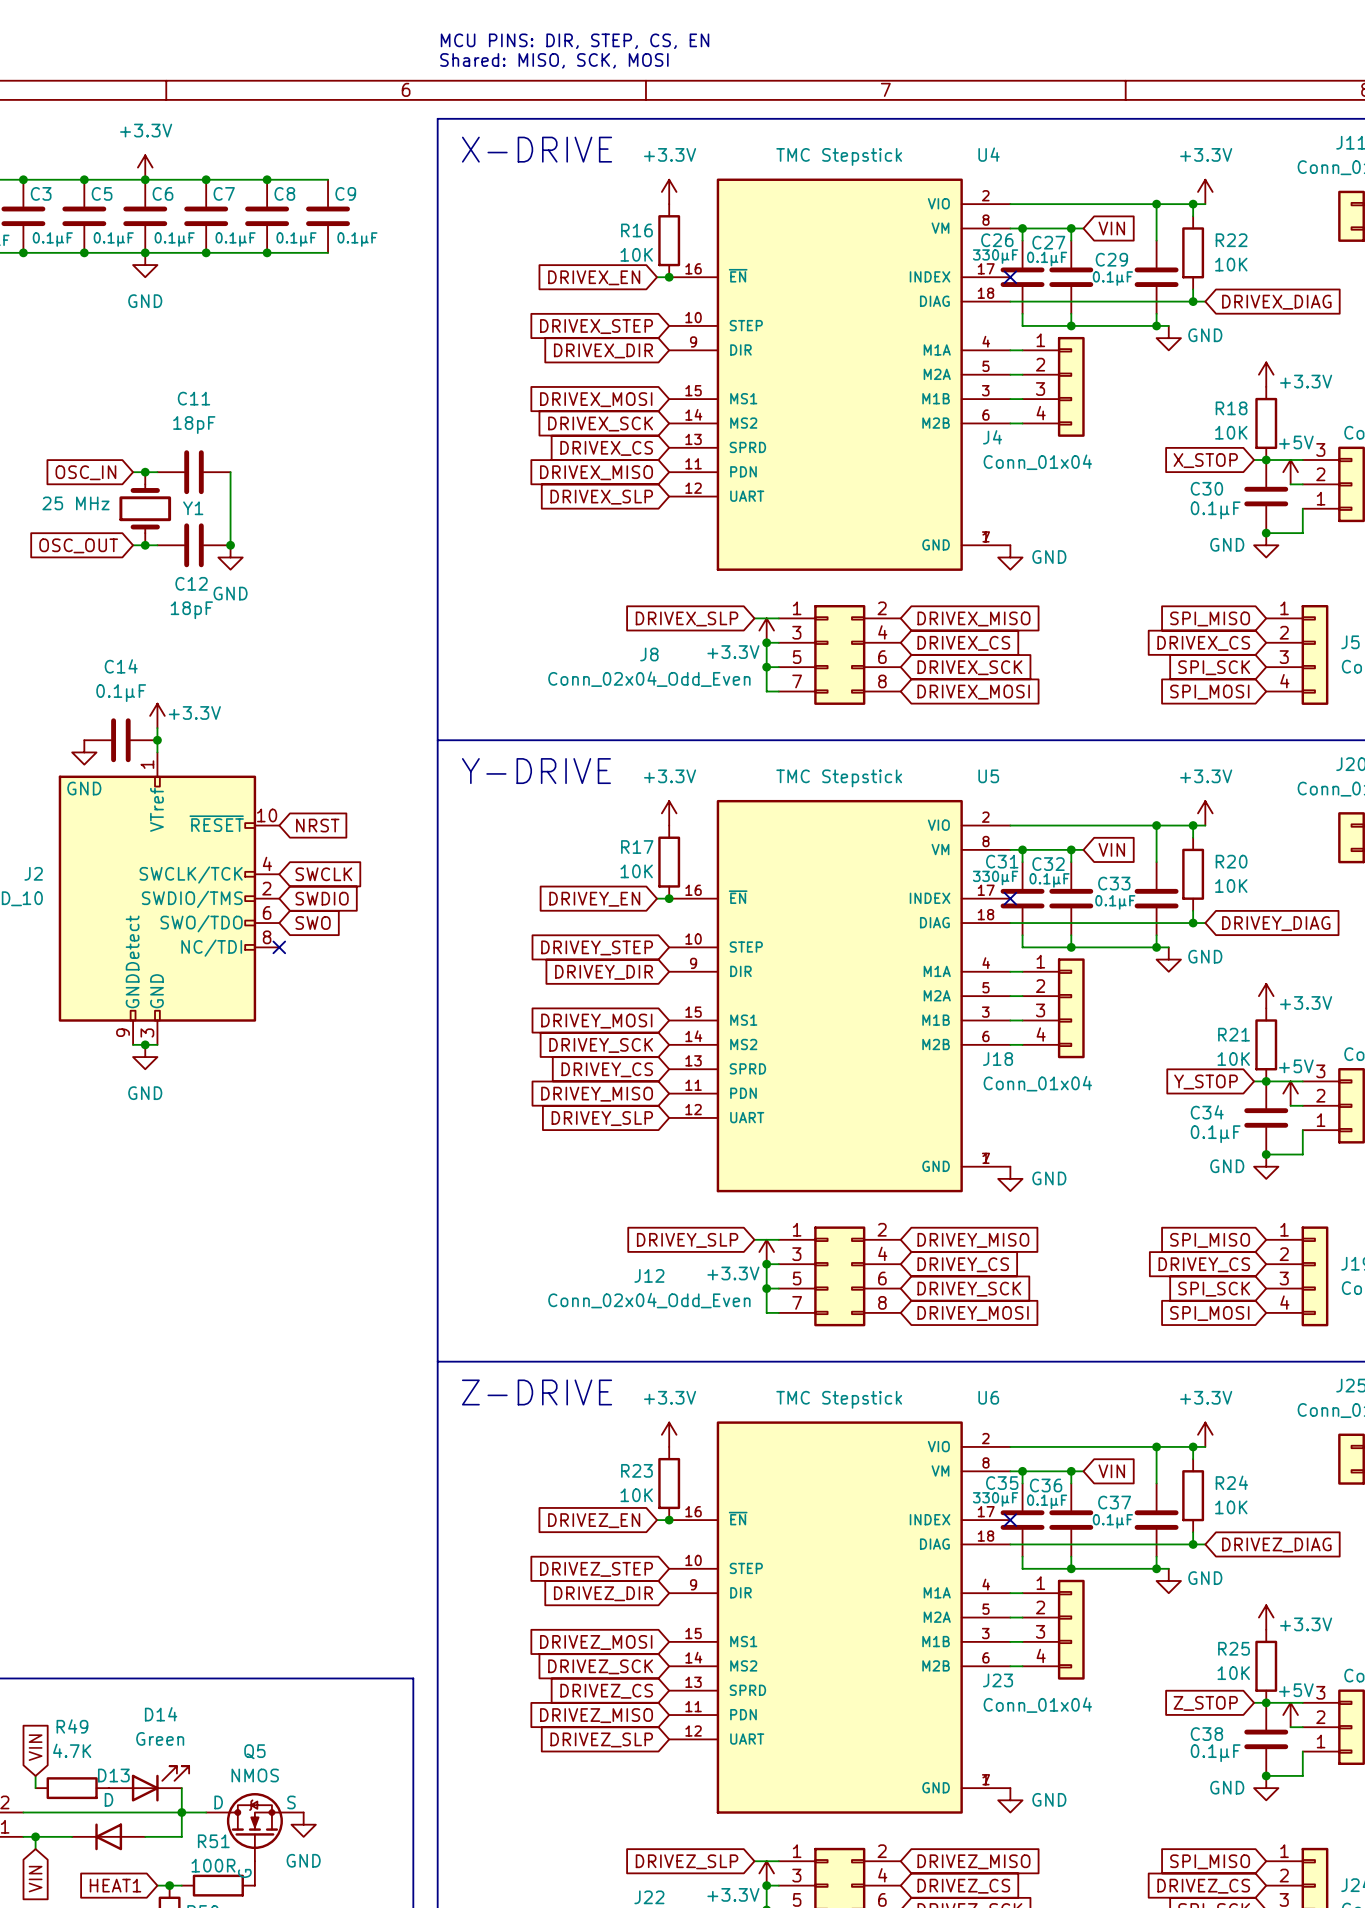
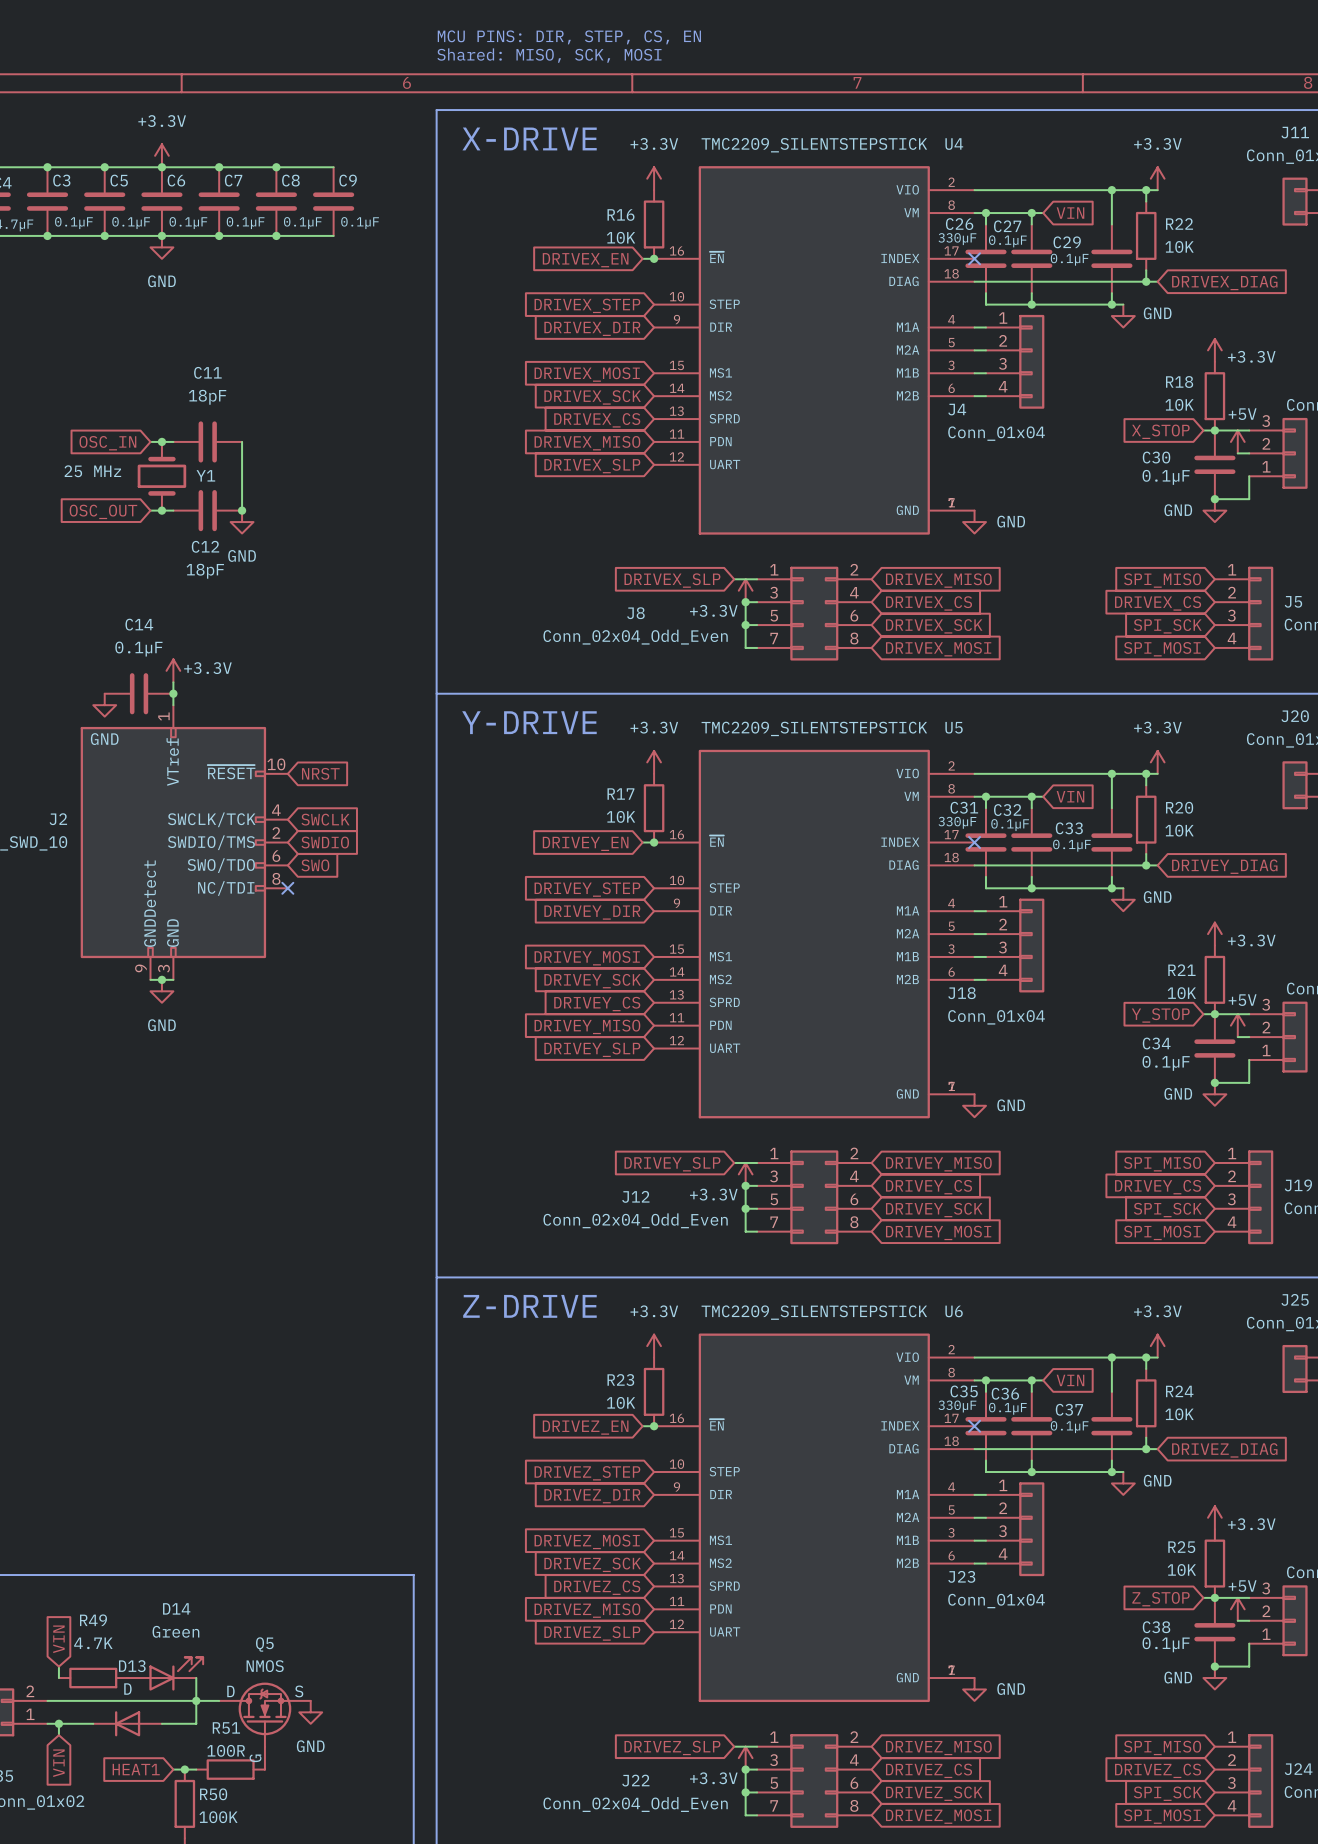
U4 value: TMC Stepstick (839, 156) -> TMC2209_SILENTSTEPSTICK (814, 145)
U5 value: TMC Stepstick (839, 778) -> TMC2209_SILENTSTEPSTICK (814, 728)
U6 value: TMC Stepstick (839, 1399) -> TMC2209_SILENTSTEPSTICK (814, 1312)

